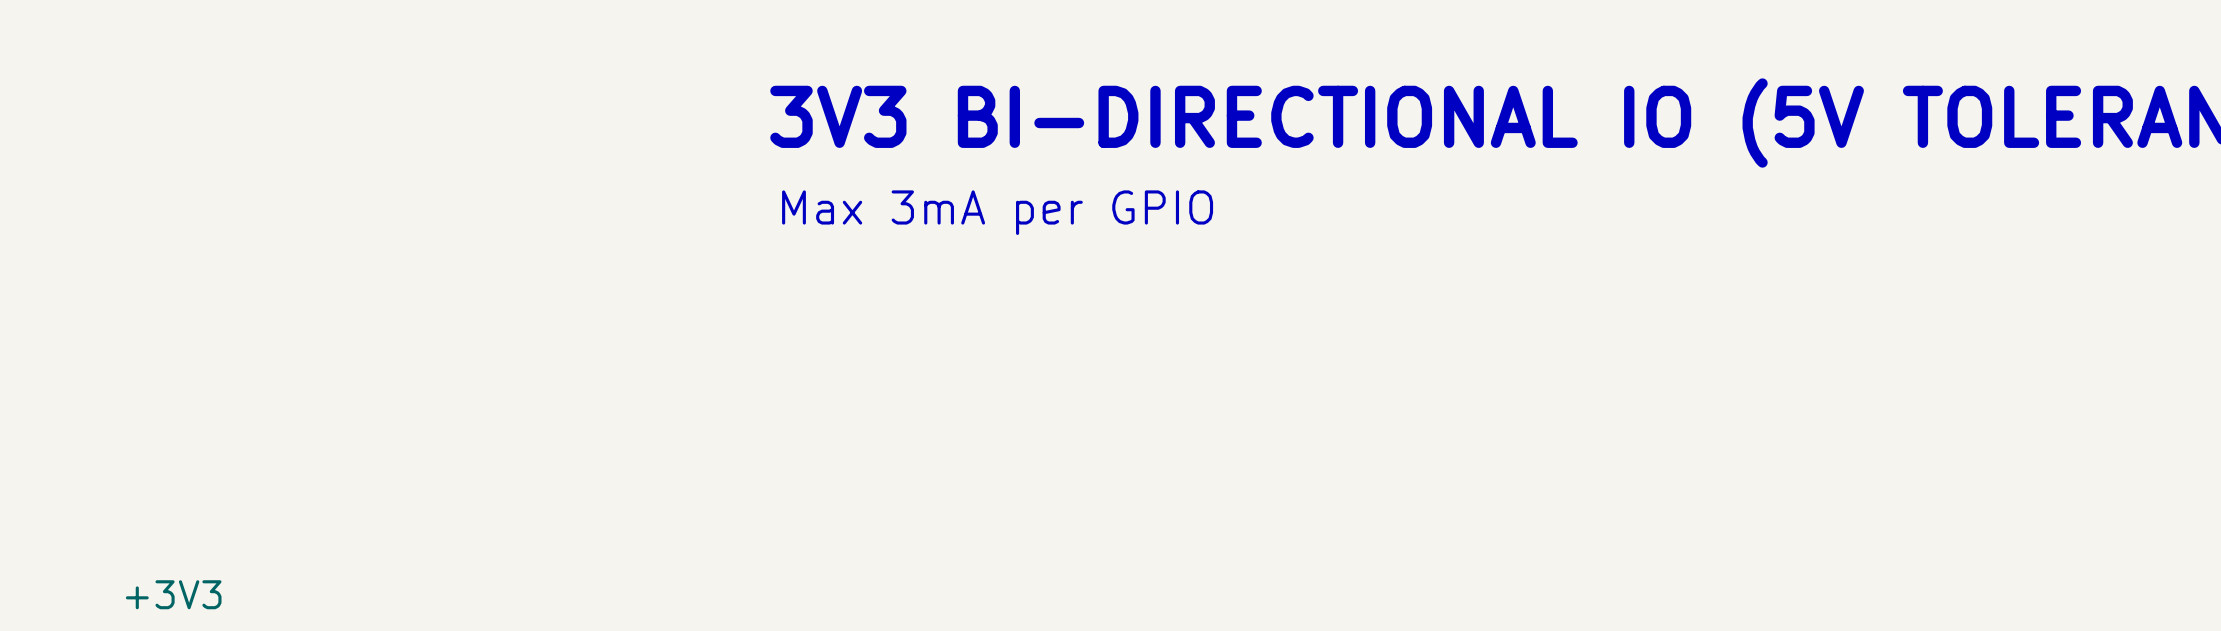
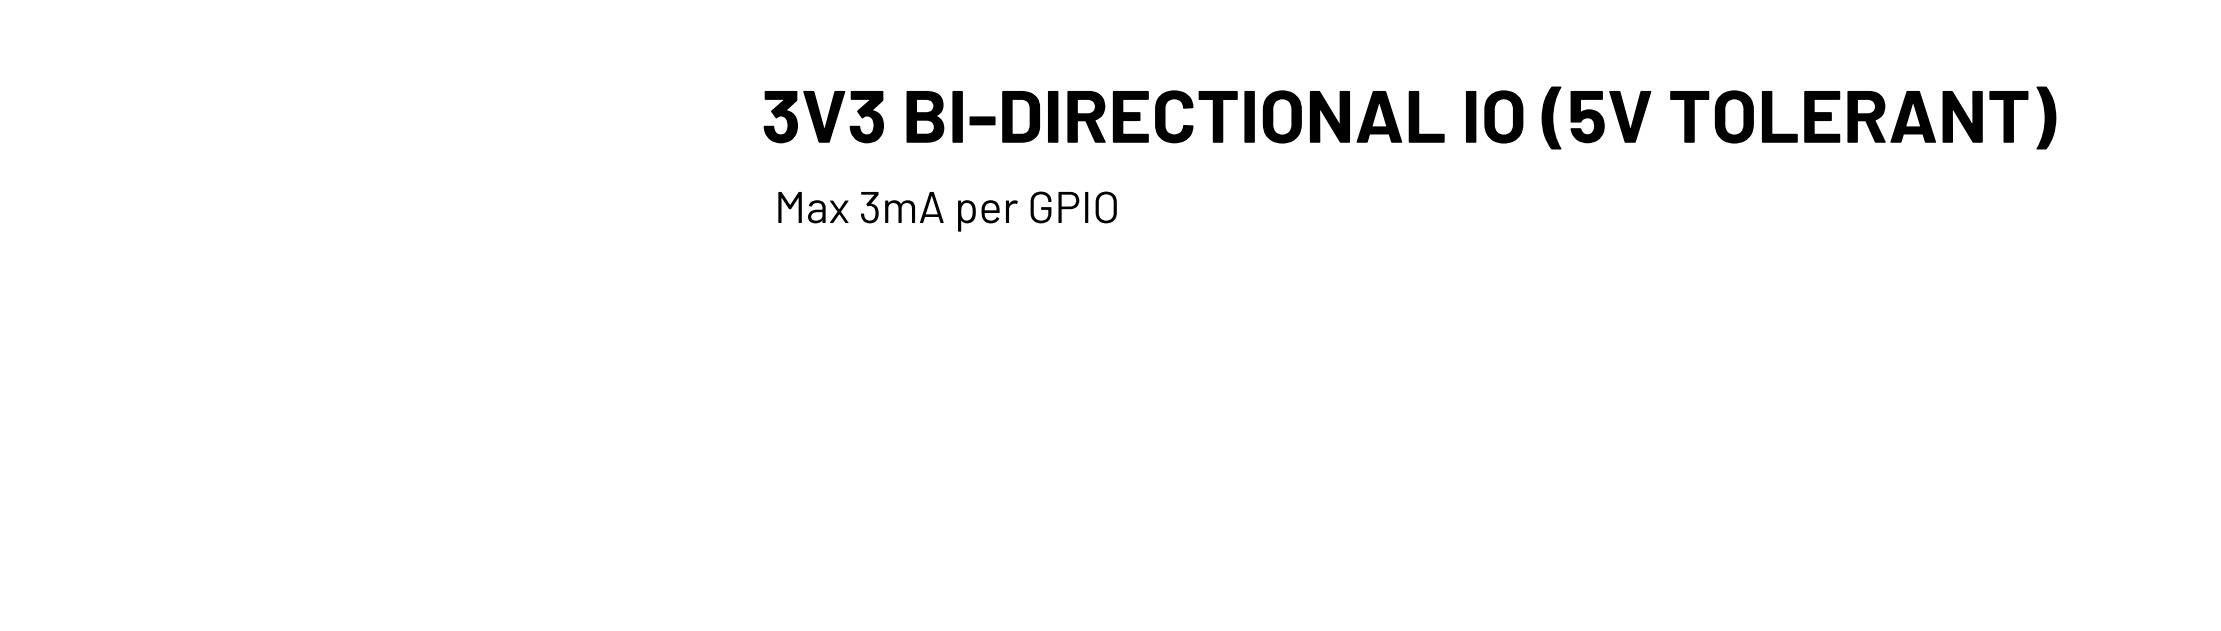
power symbol text: +3V3 (173, 594) -> none

